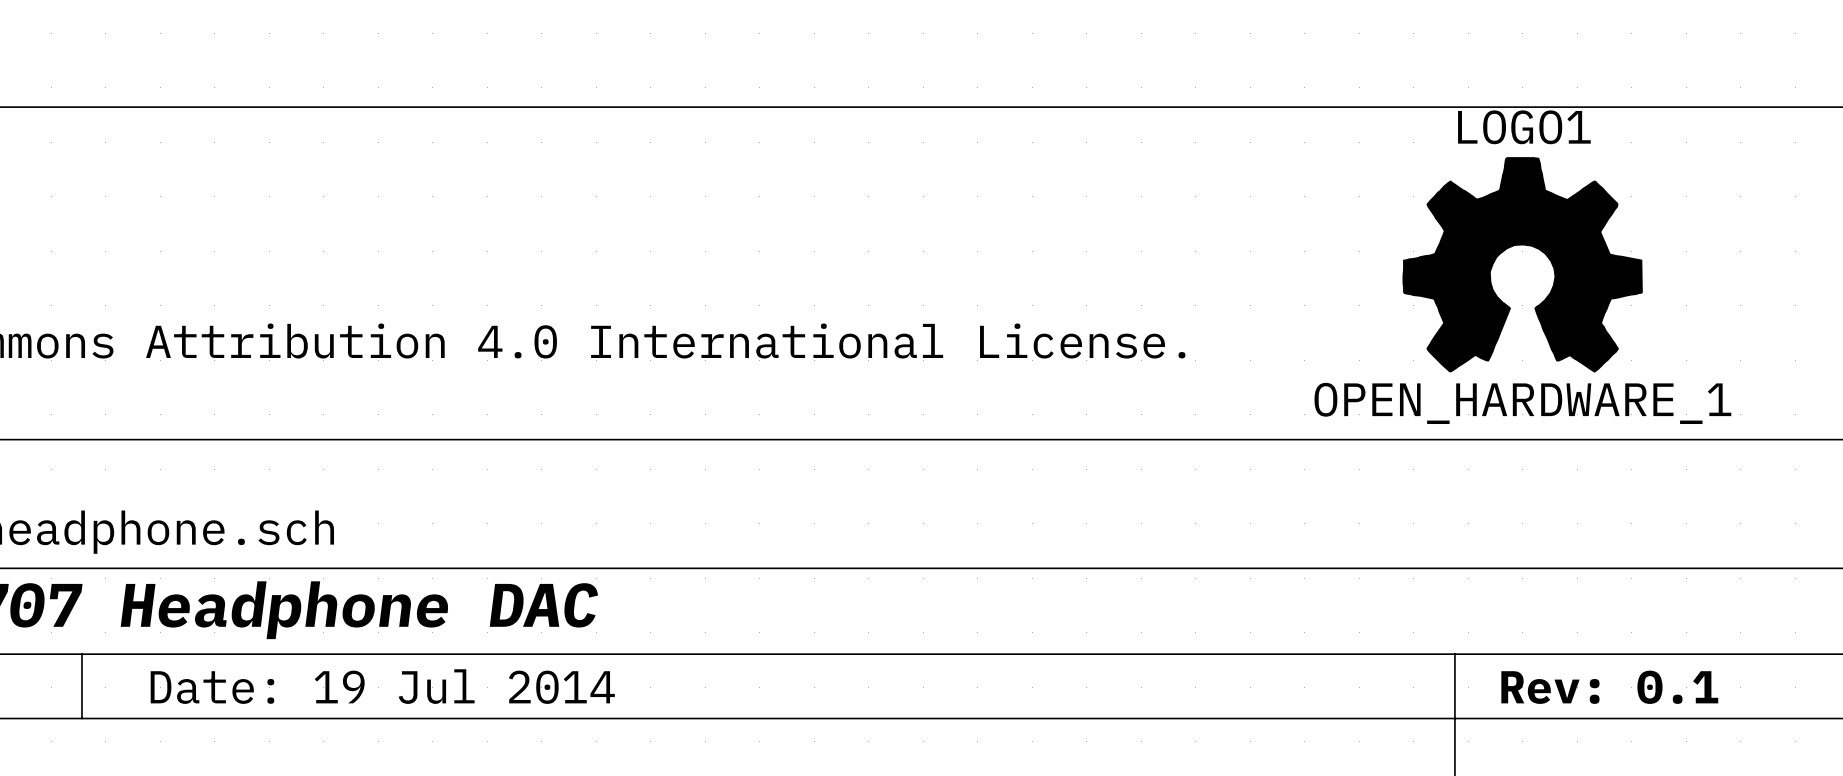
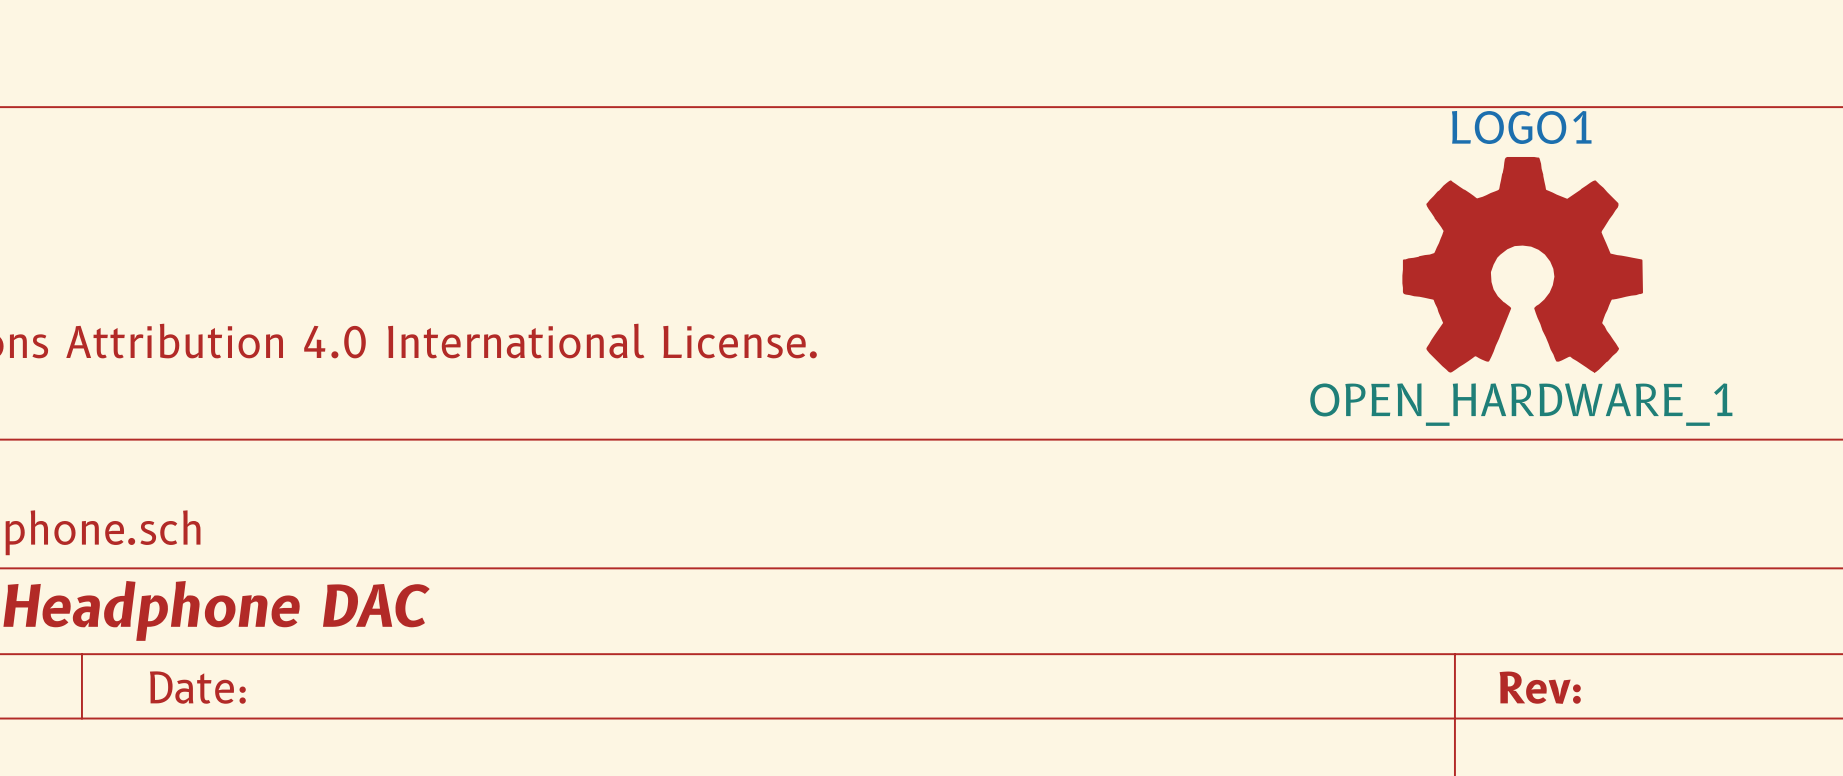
title block: Date: 19 Jul 2014 (382, 686) -> Date: (197, 687)
title block: Rev: 0.1 (1609, 687) -> Rev: (1540, 687)

